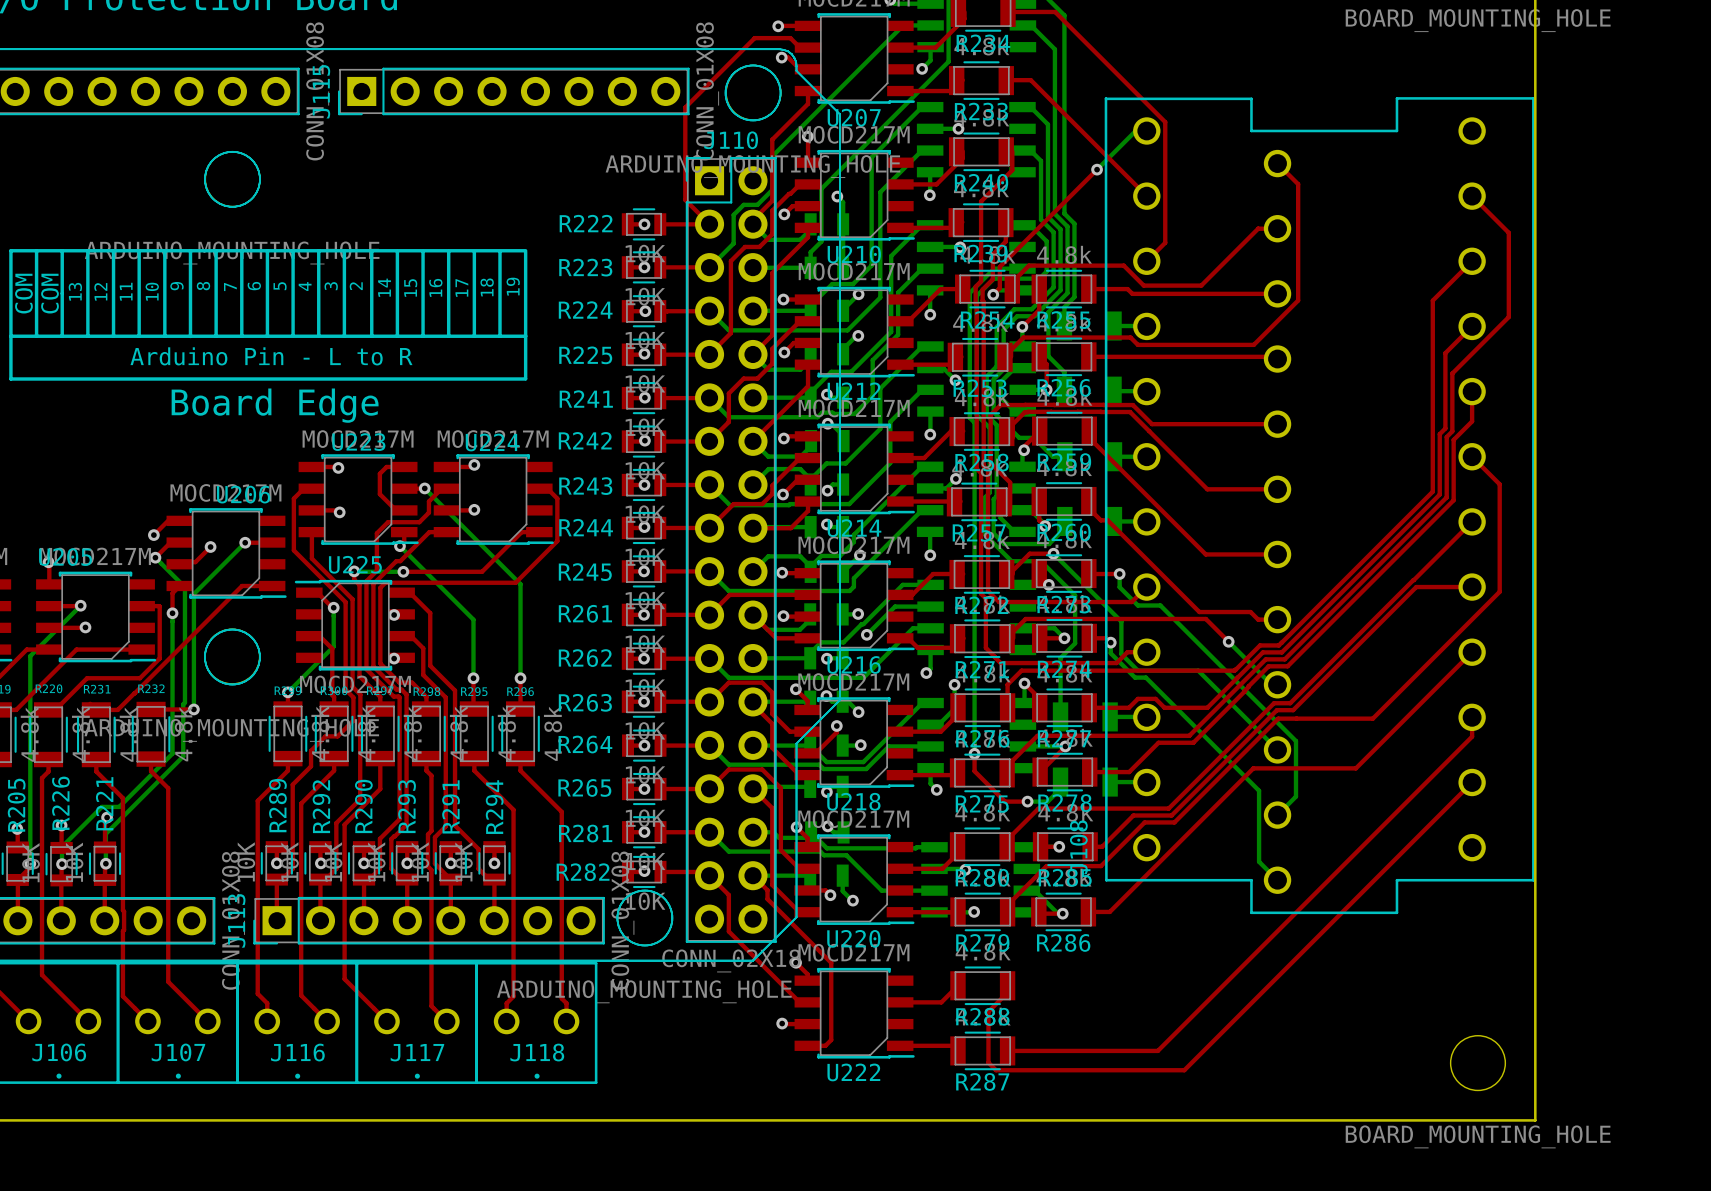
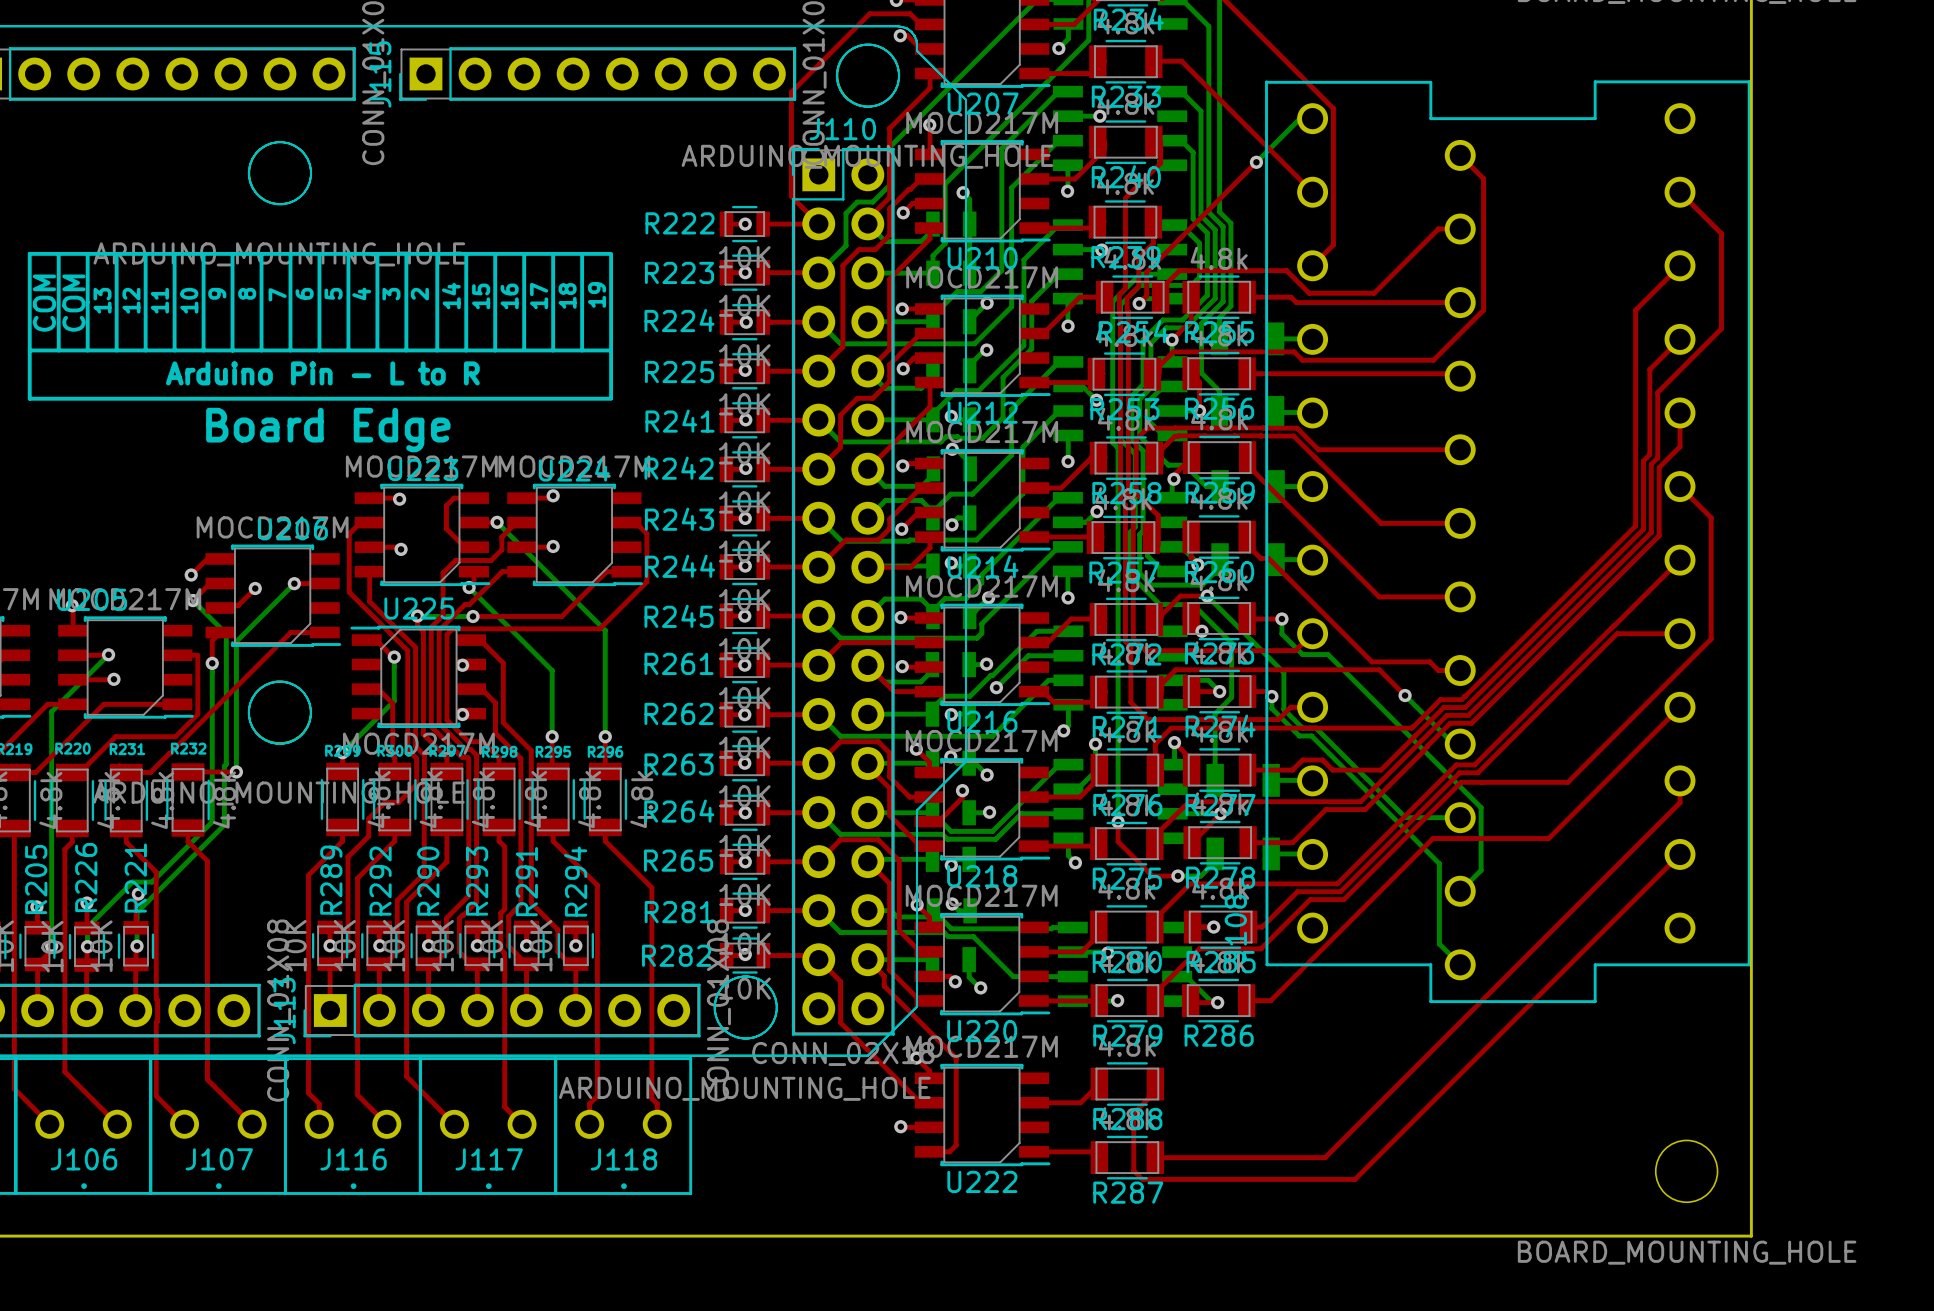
bottom track: (1149, 670) (1198, 670) (1277, 749) -> (1316, 728) (1405, 817) (1460, 817)

